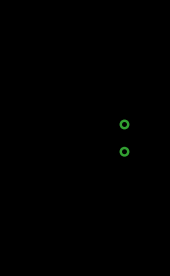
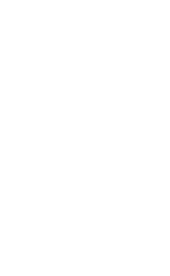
part: (124, 138) -> none

